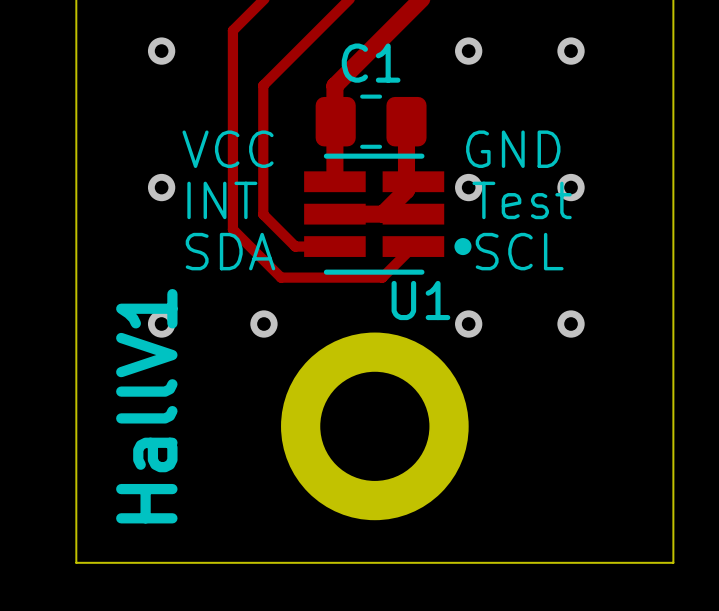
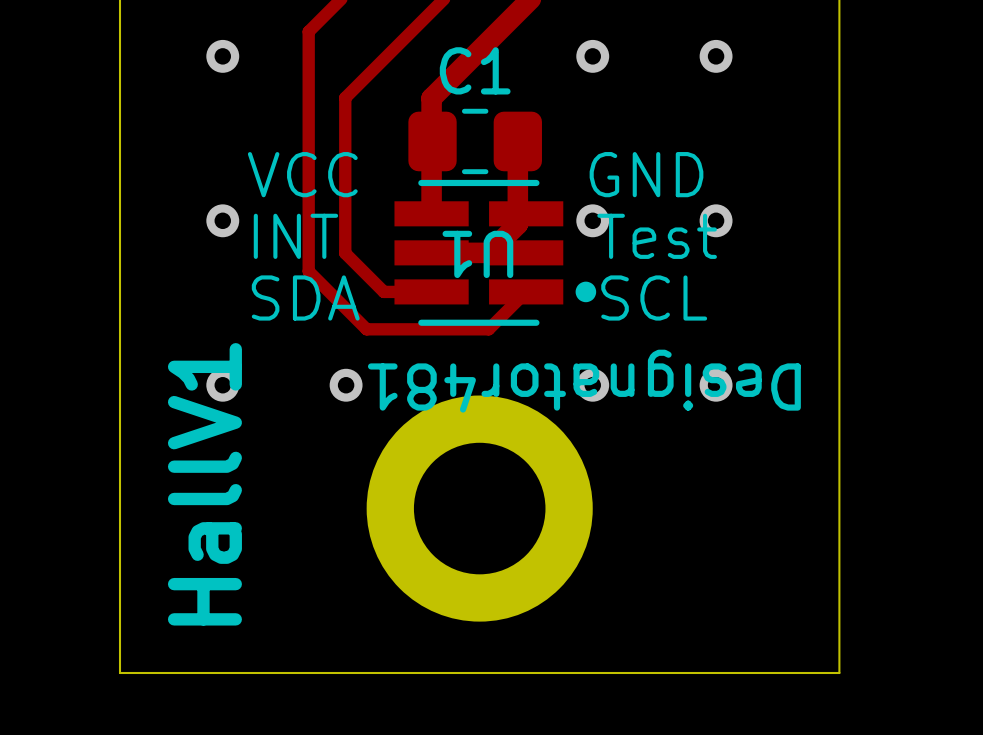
U1 name rotation: 0° (420, 300) -> 180° (477, 254)
U1 name position: U1 (420, 300) -> U1 (477, 254)
U1 text: none -> Designator481 (584, 381)

